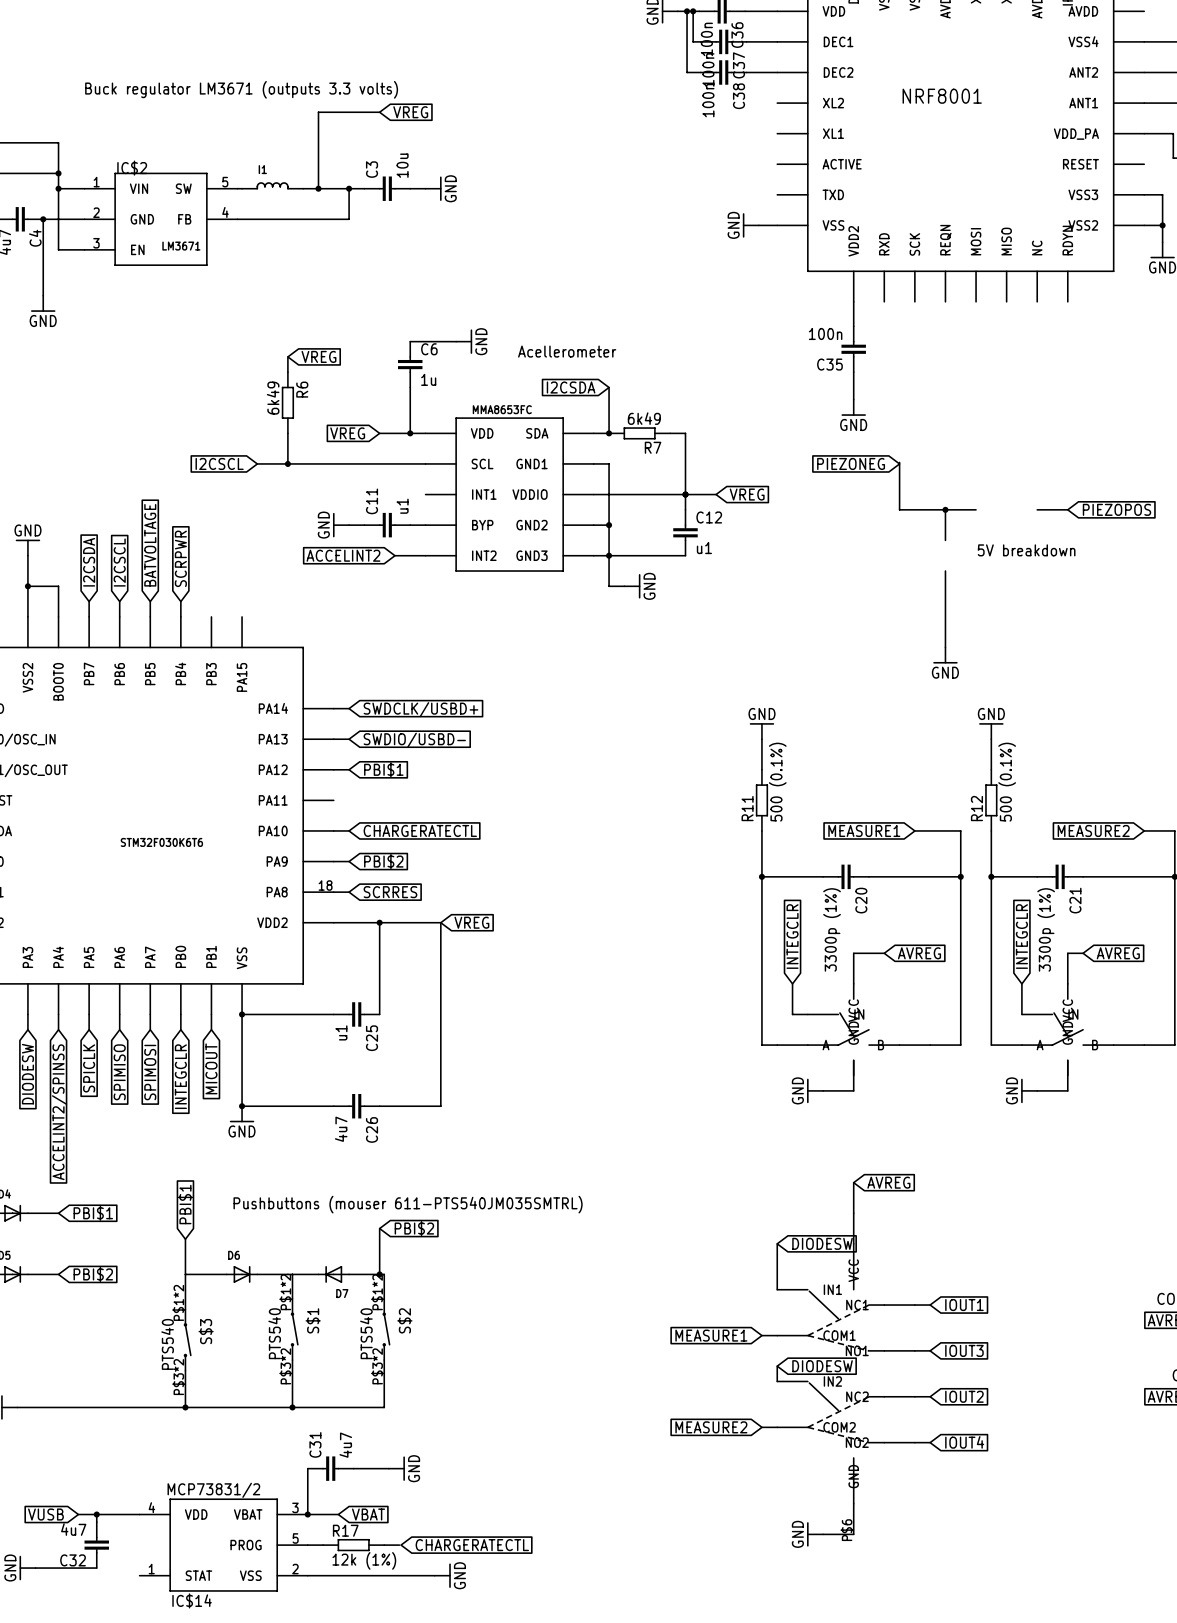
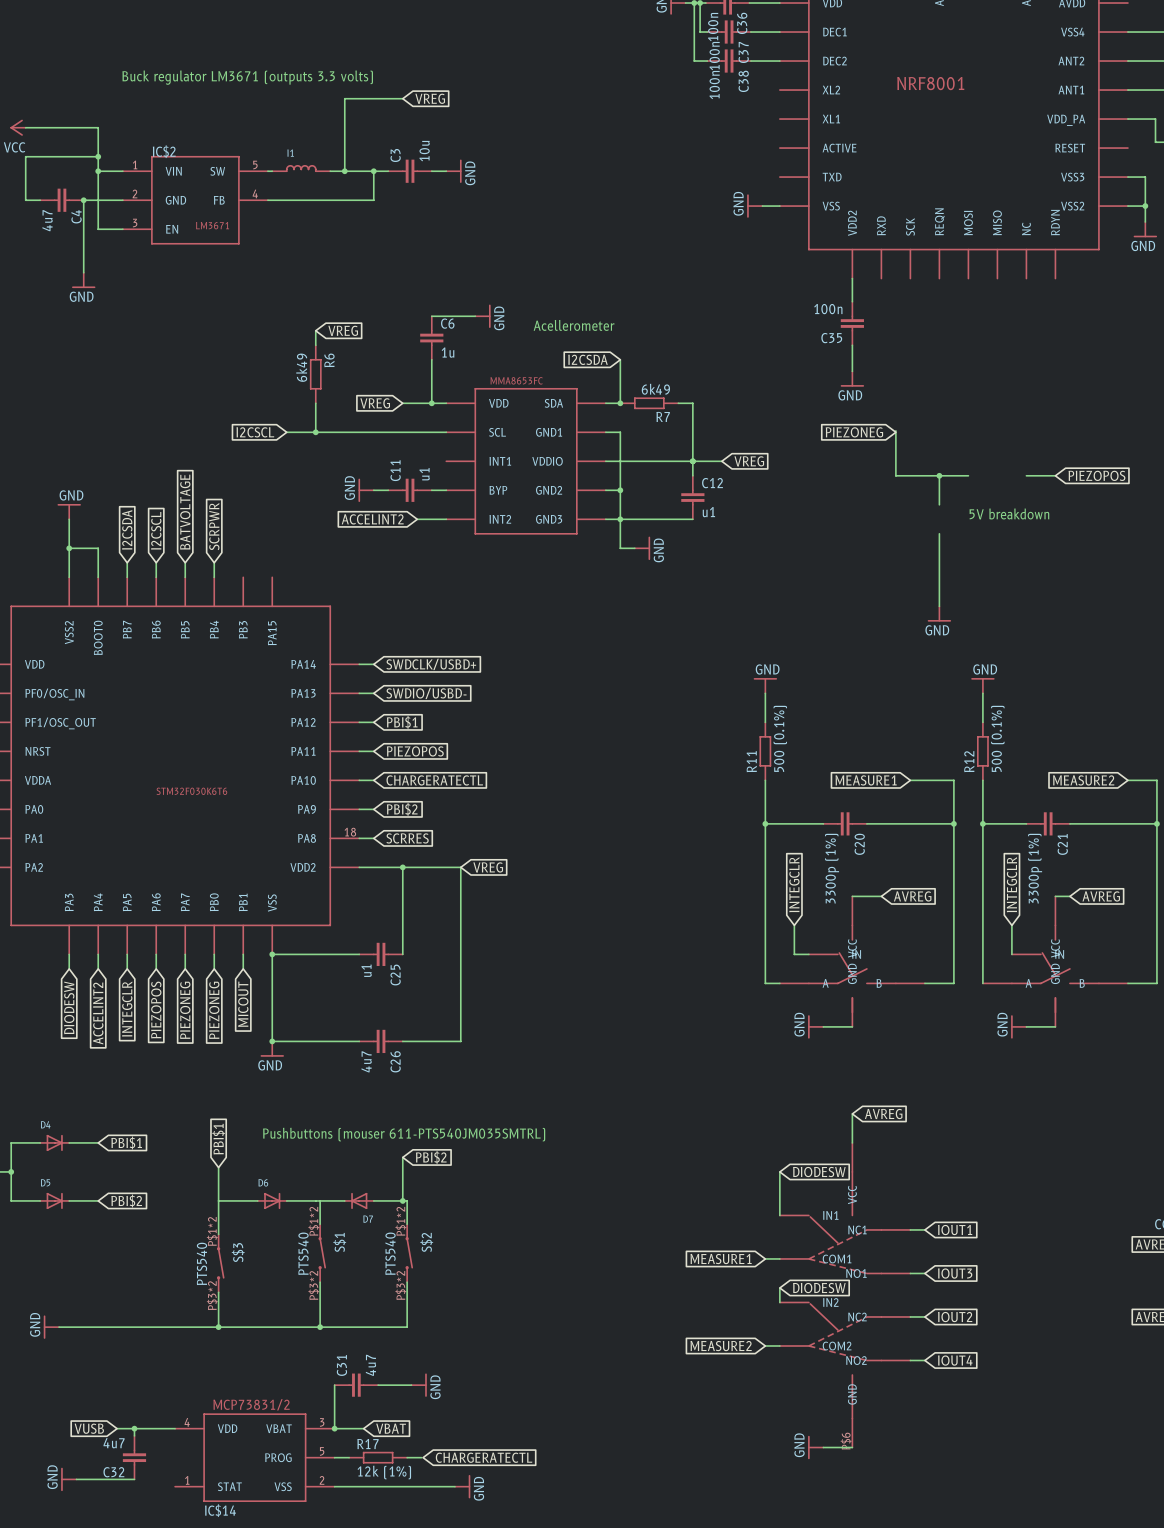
wire: none -> (359, 751) (373, 751)
global label: none -> PIEZOPOS (415, 751)
global label: SPICLK (89, 1068) -> INTEGCLR (127, 1009)
global label: SPIMISO (119, 1072) -> PIEZOPOS (156, 1010)
global label: SPIMOSI (150, 1072) -> PIEZONEG (185, 1010)
global label: INTEGCLR (180, 1076) -> PIEZONEG (214, 1010)
global label: ACCELINT2/SPINSS (59, 1112) -> ACCELINT2 (98, 1013)

